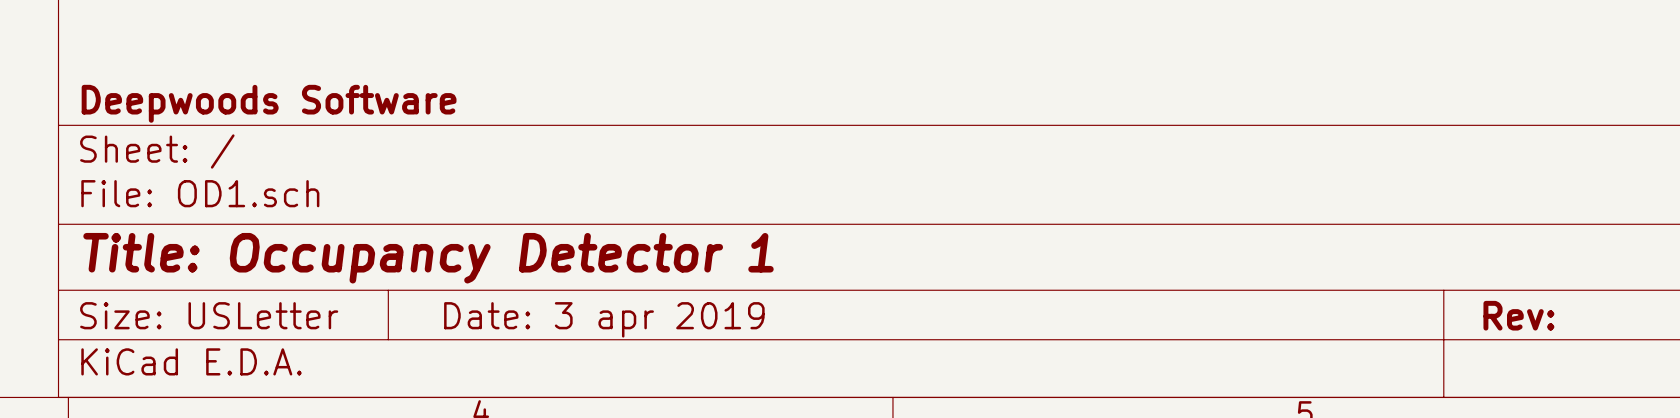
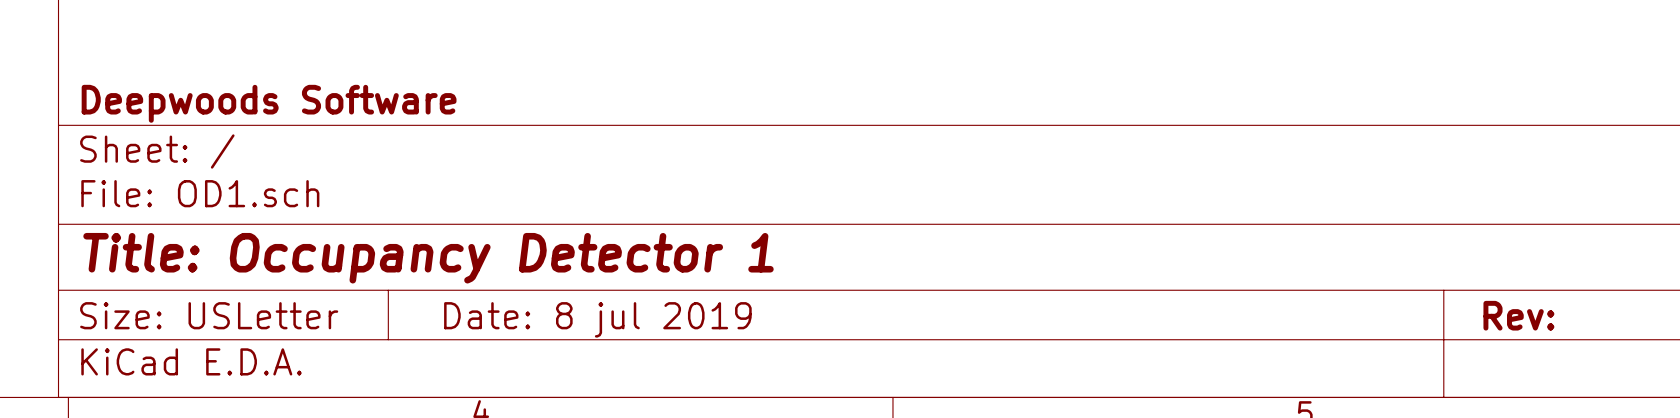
title block: Date: 3 apr 2019 (604, 319) -> Date: 8 jul 2019 (597, 319)

